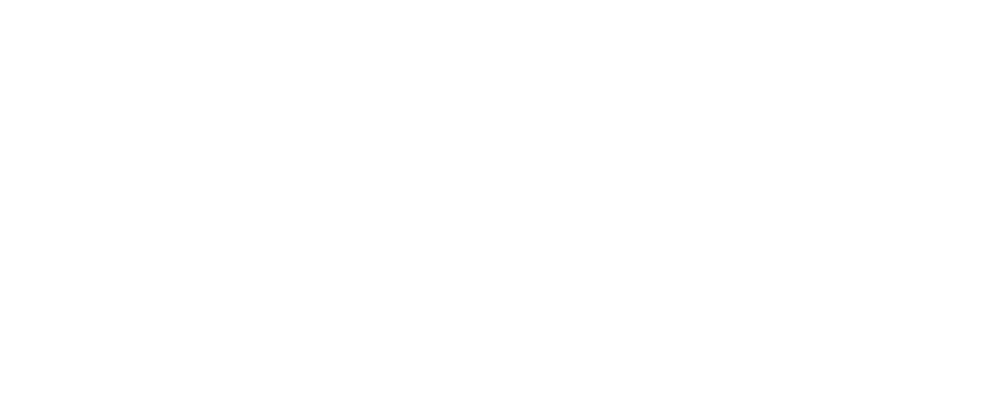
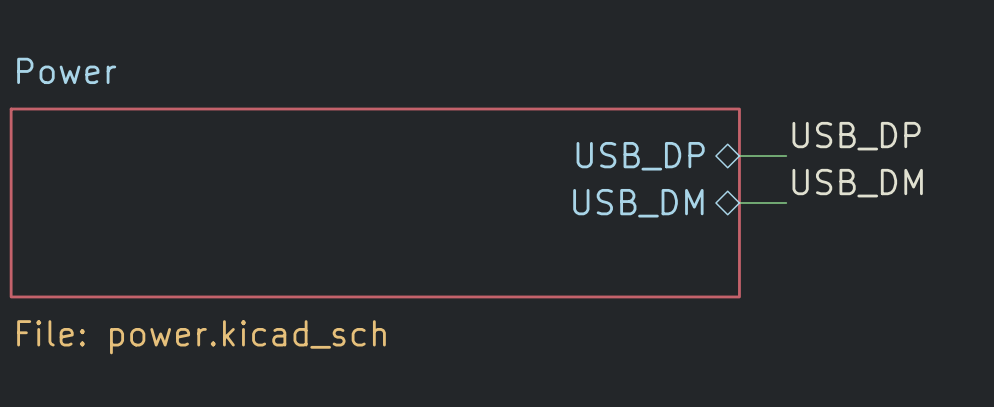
label: none -> USB_DP (856, 136)
sheet pin: none -> USB_DP (640, 156)
wire: none -> (739, 156) (786, 156)
label: none -> USB_DM (857, 183)
sheet Power: none -> File: power.kicad_sch (375, 202)
wire: none -> (739, 202) (786, 202)
sheet pin: none -> USB_DM (638, 203)

